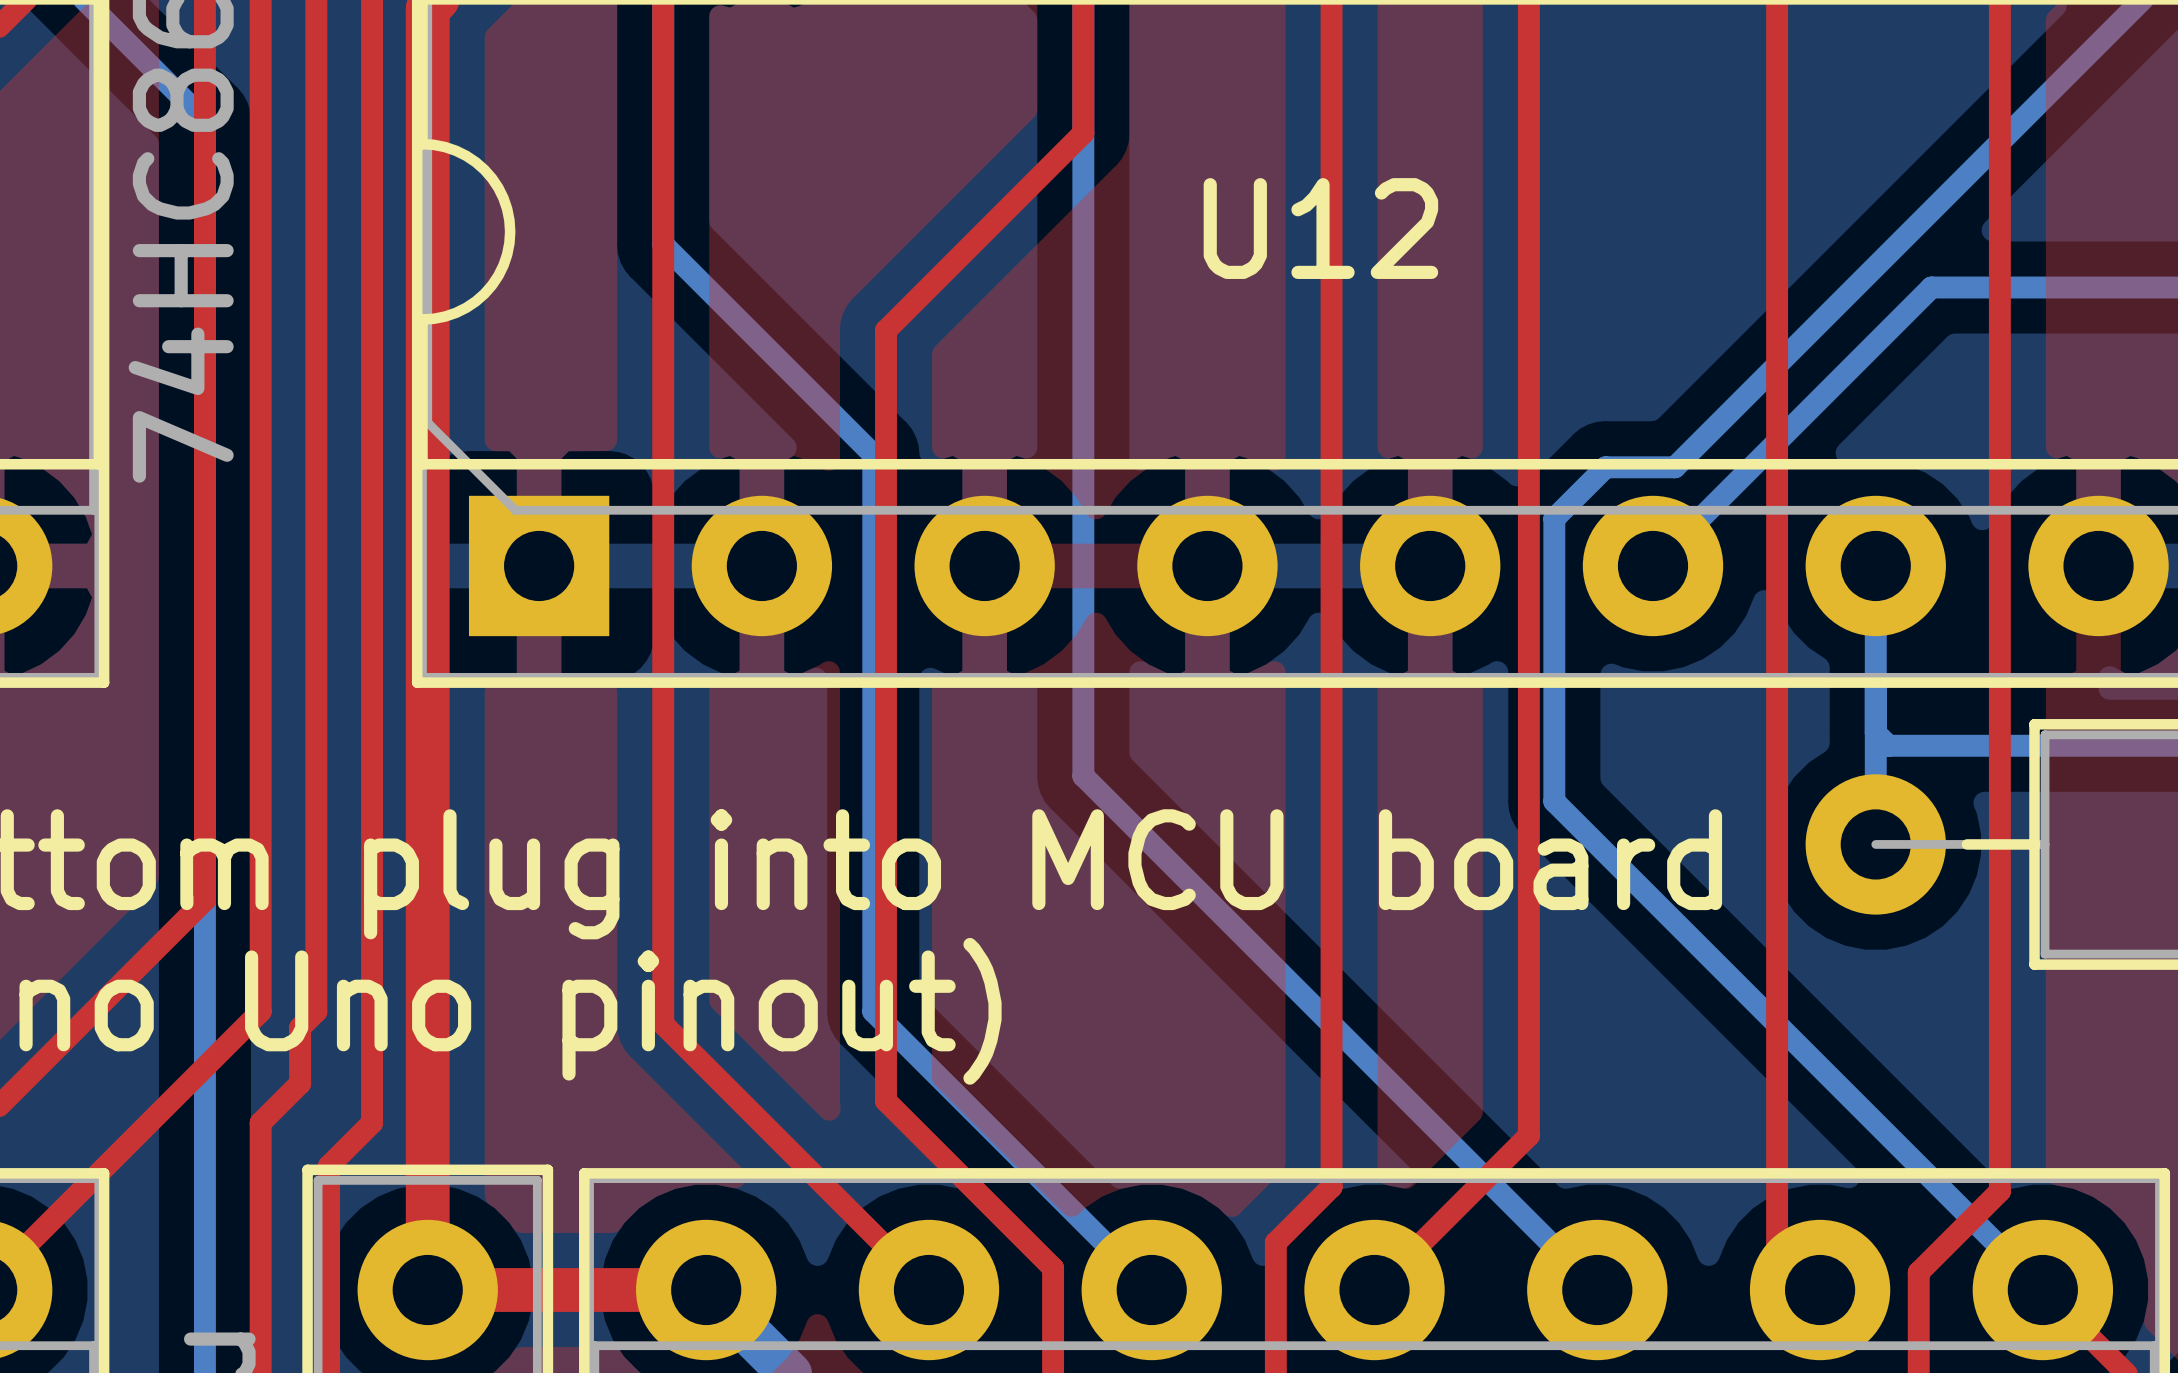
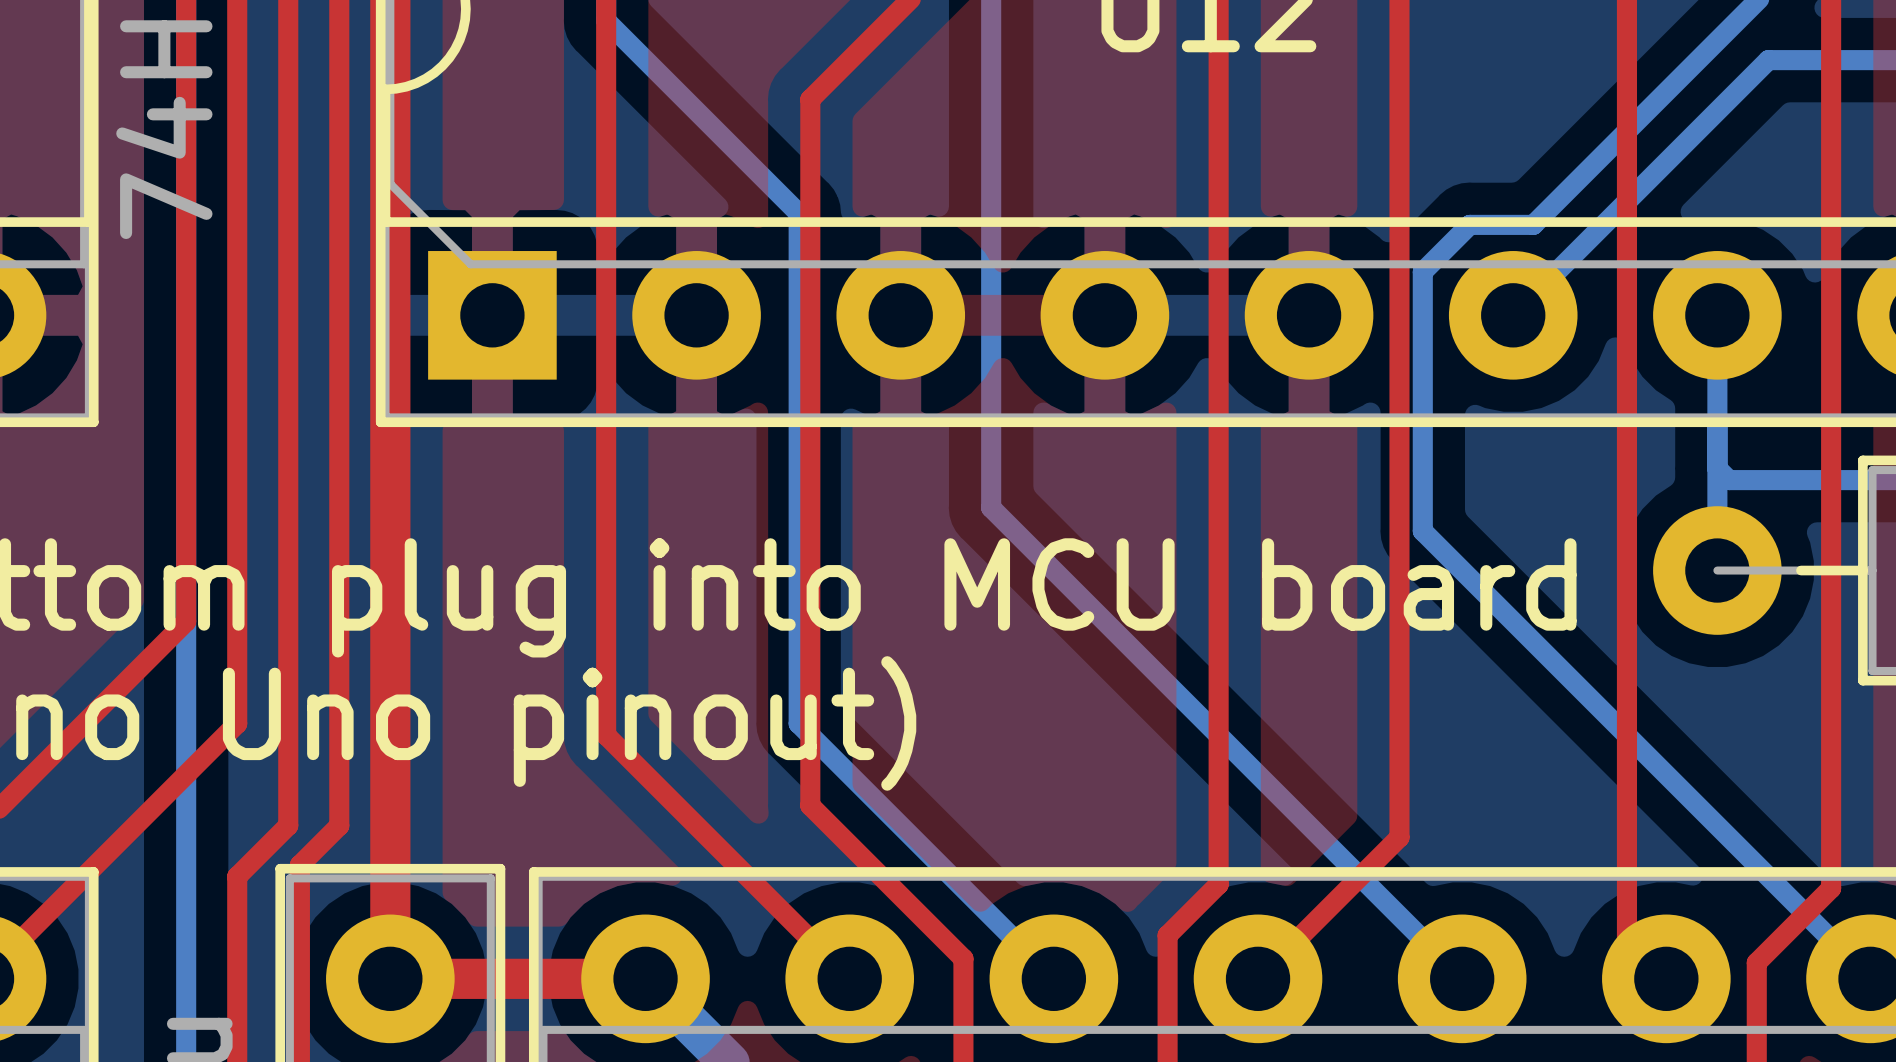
top track: (316, 1011) (300, 1027) (300, 1083) (260, 1122) (260, 1178) -> (288, 723) (288, 825) (237, 876)

